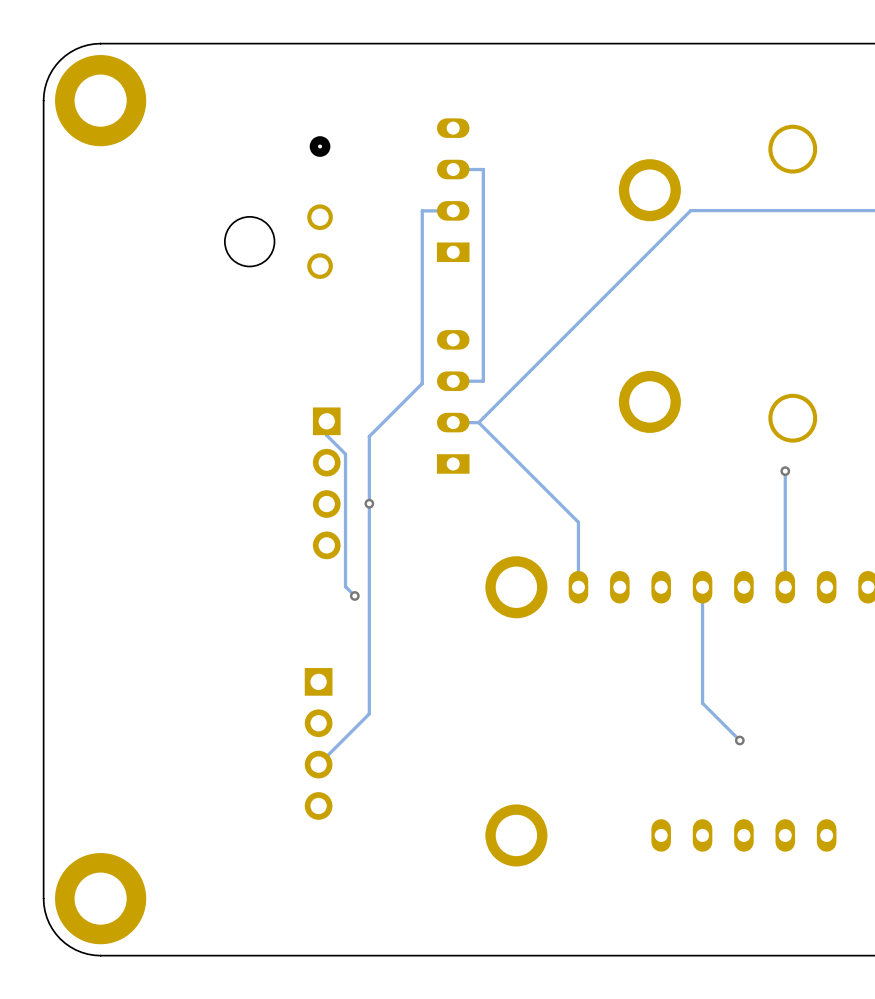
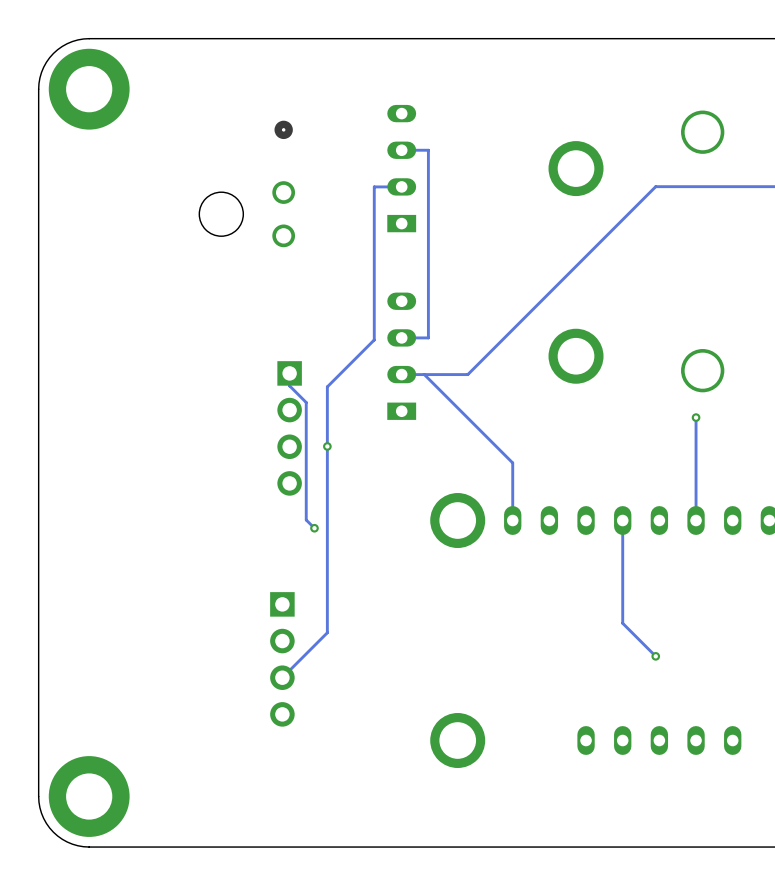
track: (739, 210) (690, 210) (478, 422) (578, 522) -> (655, 186) (467, 374) (424, 374) (512, 462)

